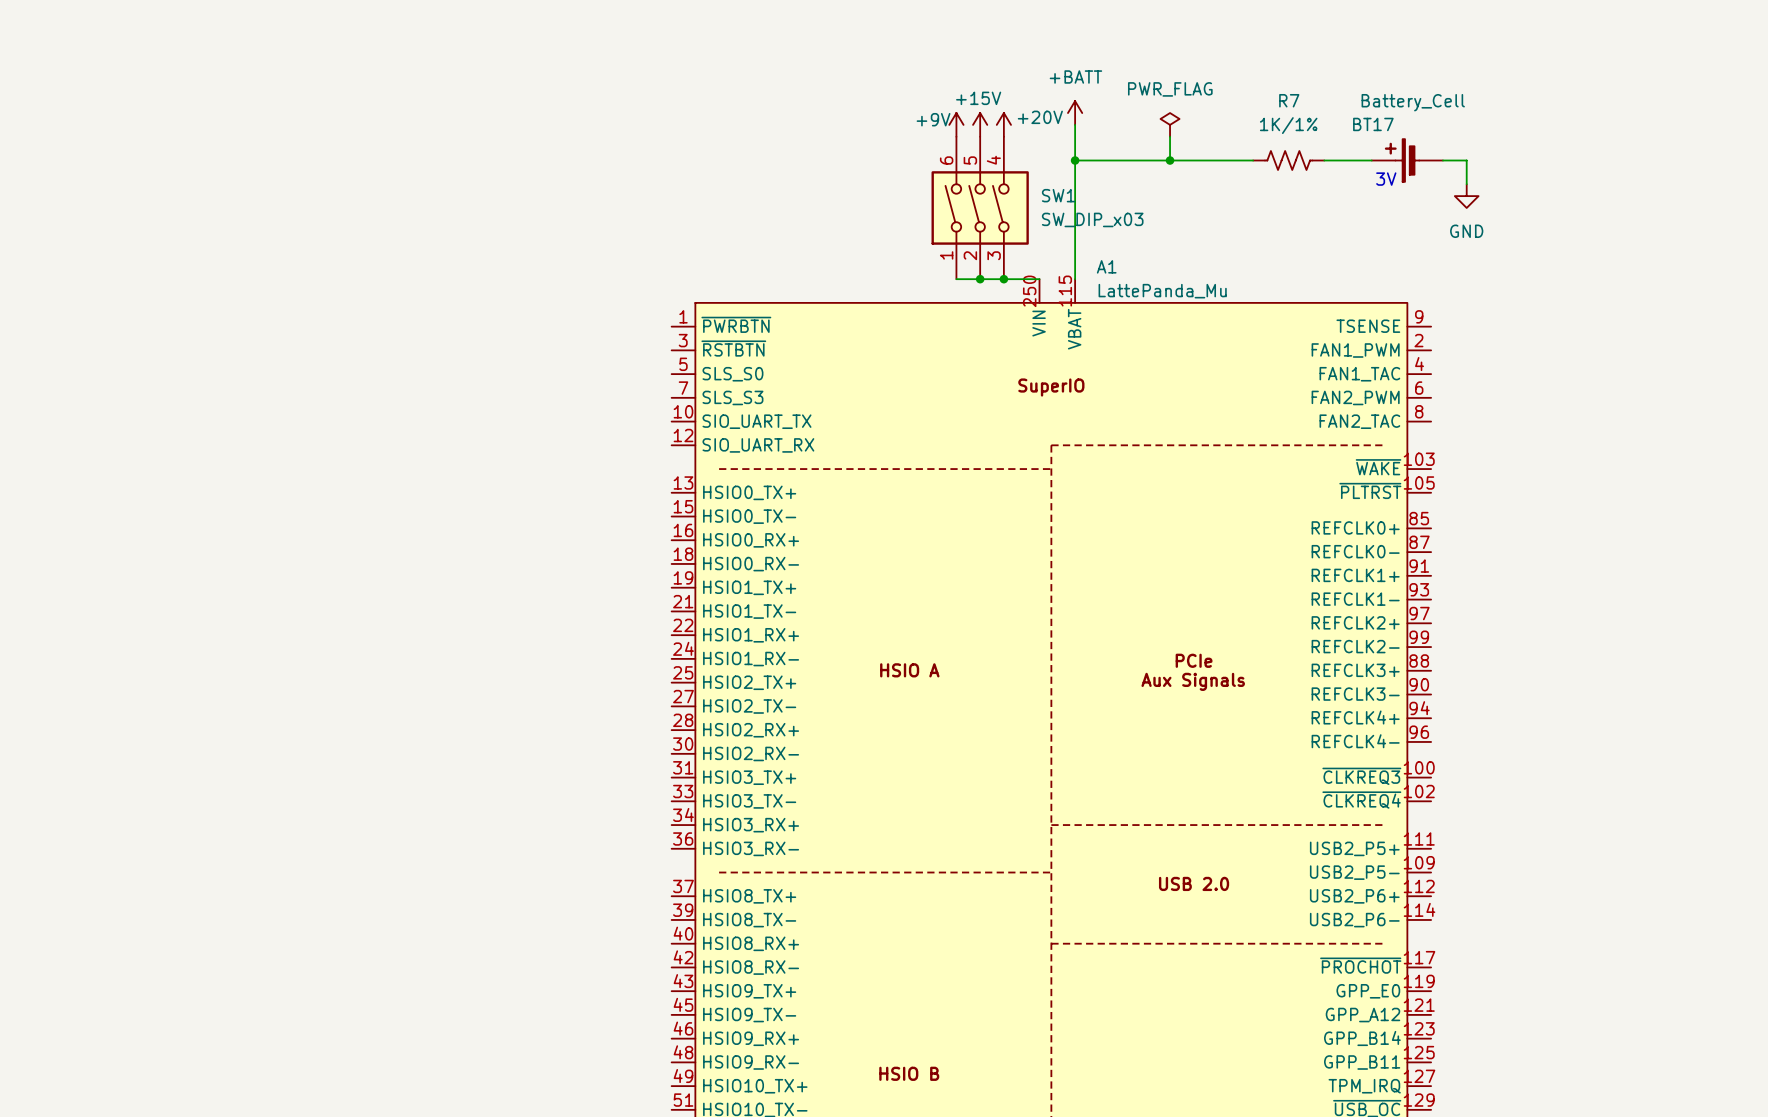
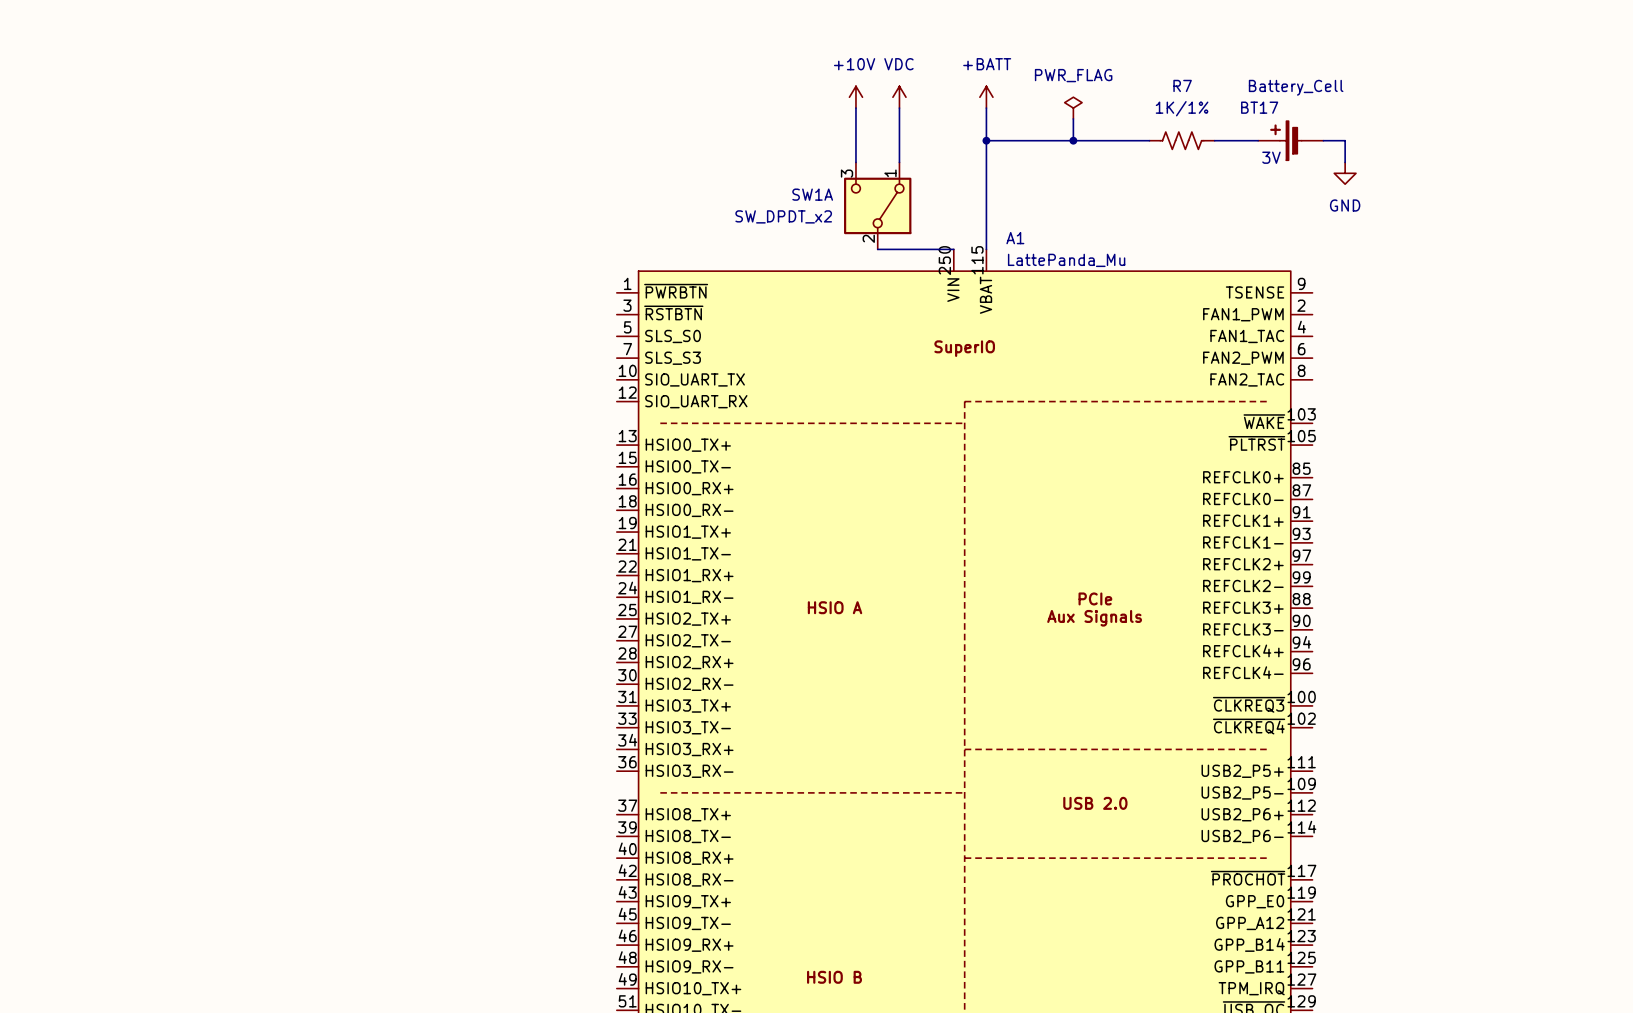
power symbol: none -> +10V (855, 97)
power symbol: none -> VDC (899, 97)
wire: none -> (855, 108) (855, 162)
power symbol: +9V (956, 124) -> none
power symbol: +15V (980, 124) -> none
power symbol: +20V (1003, 124) -> none
SW1: SW_DIP_x03 (980, 207) -> none
SW1A: none -> SW_DPDT_x2 (877, 205)
junction: (980, 279) -> none
junction: (1003, 279) -> none

